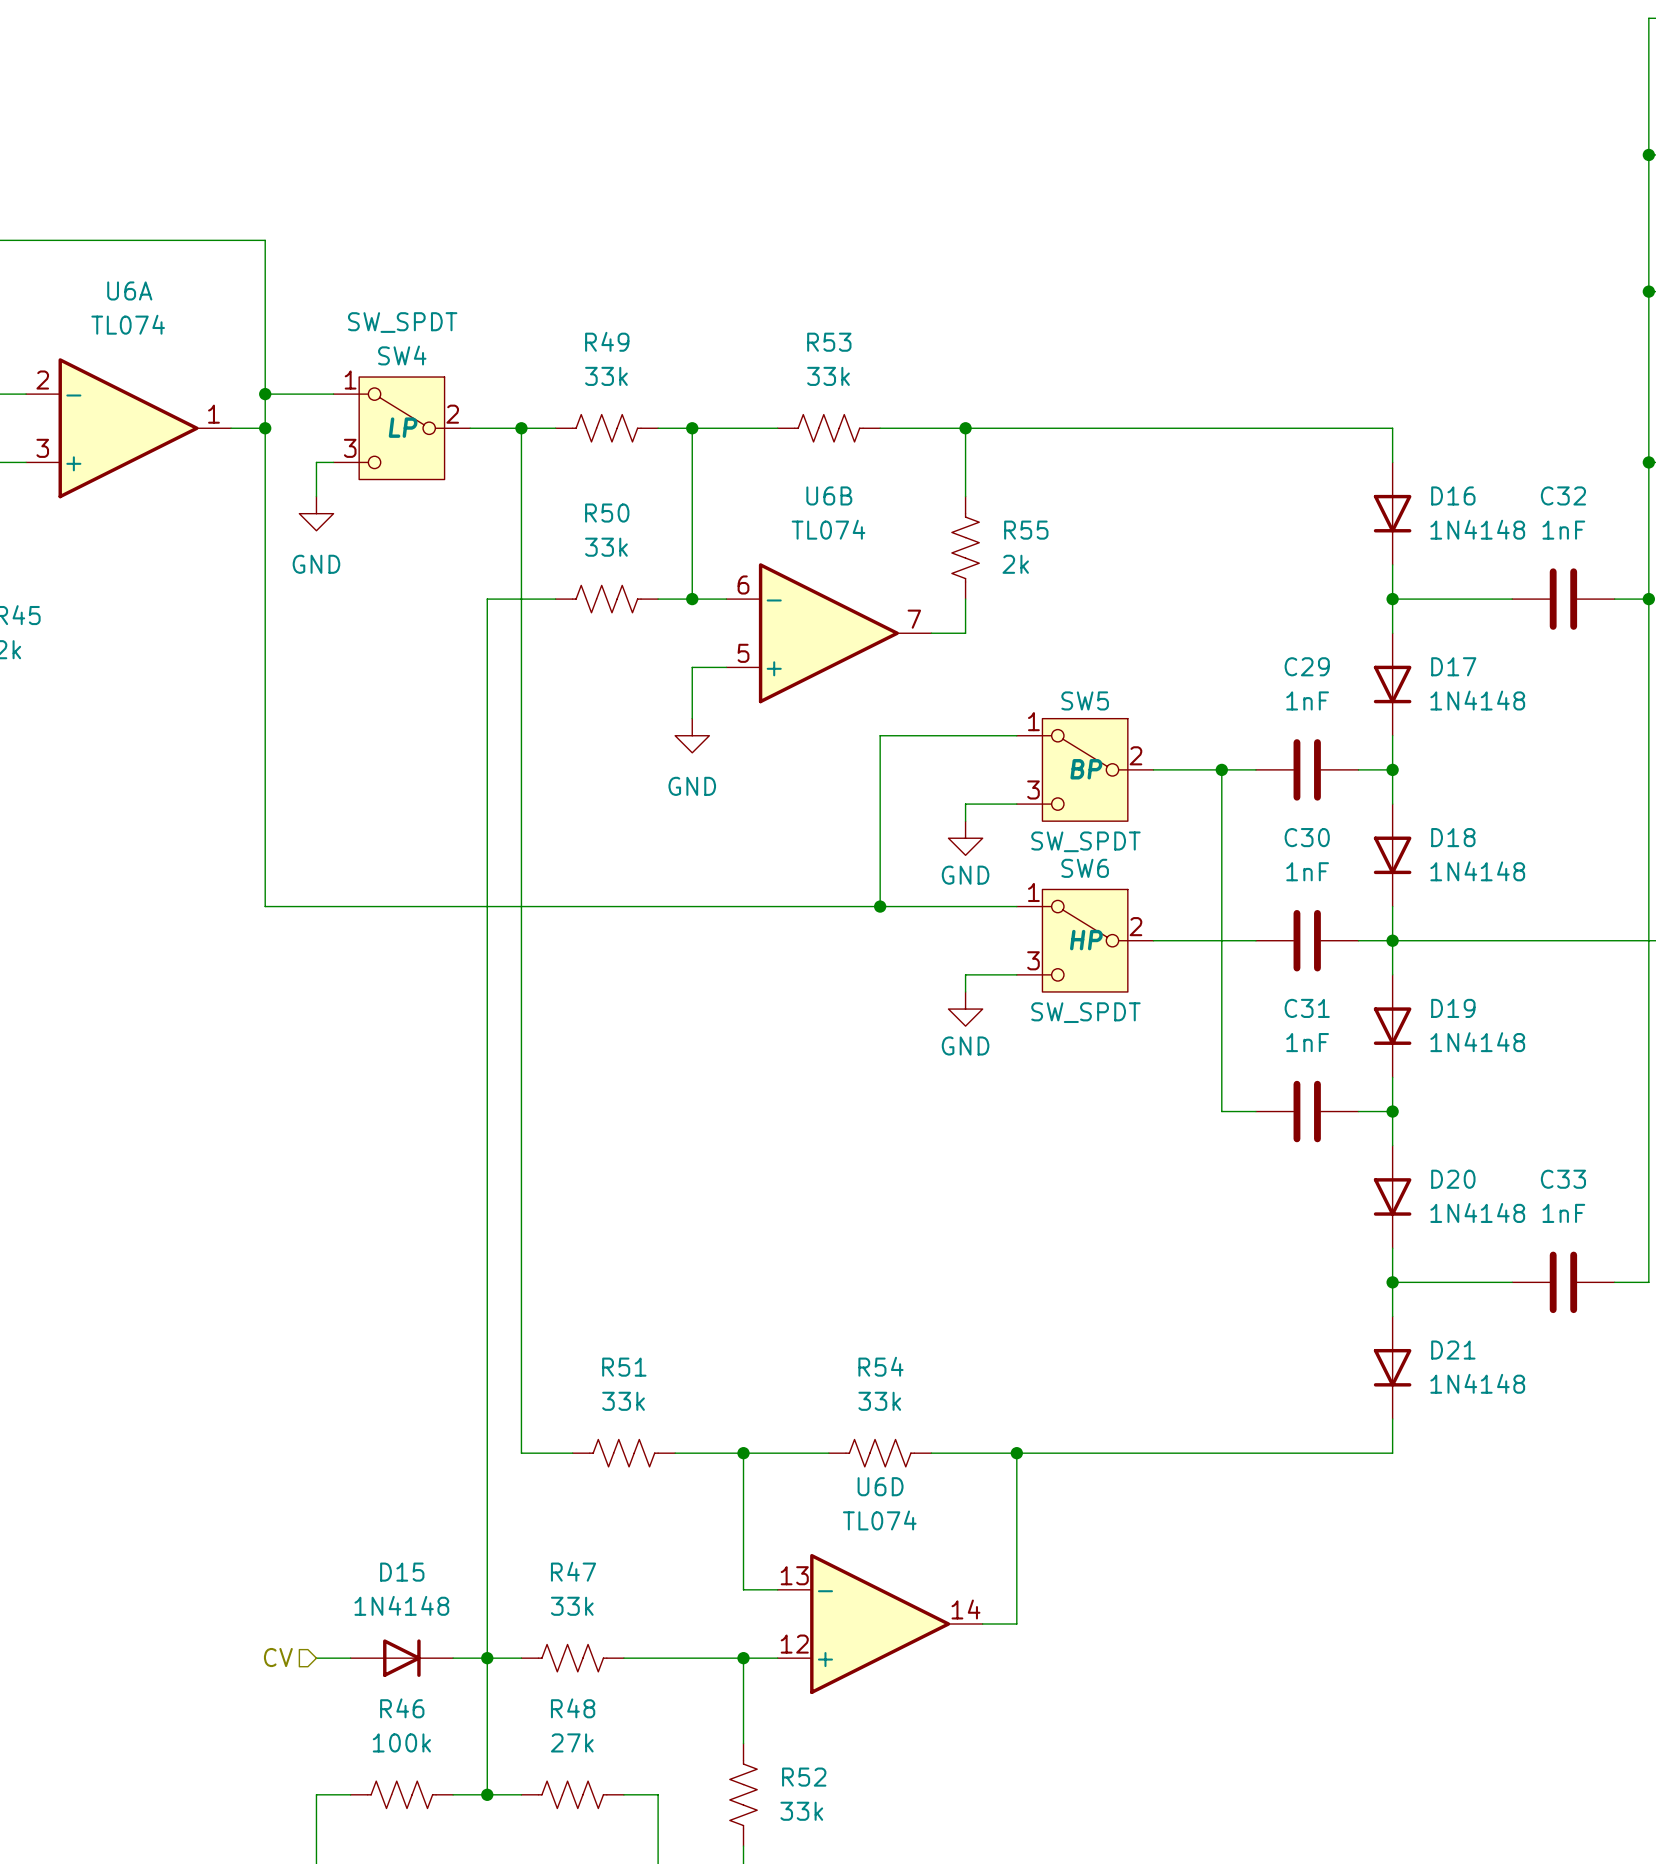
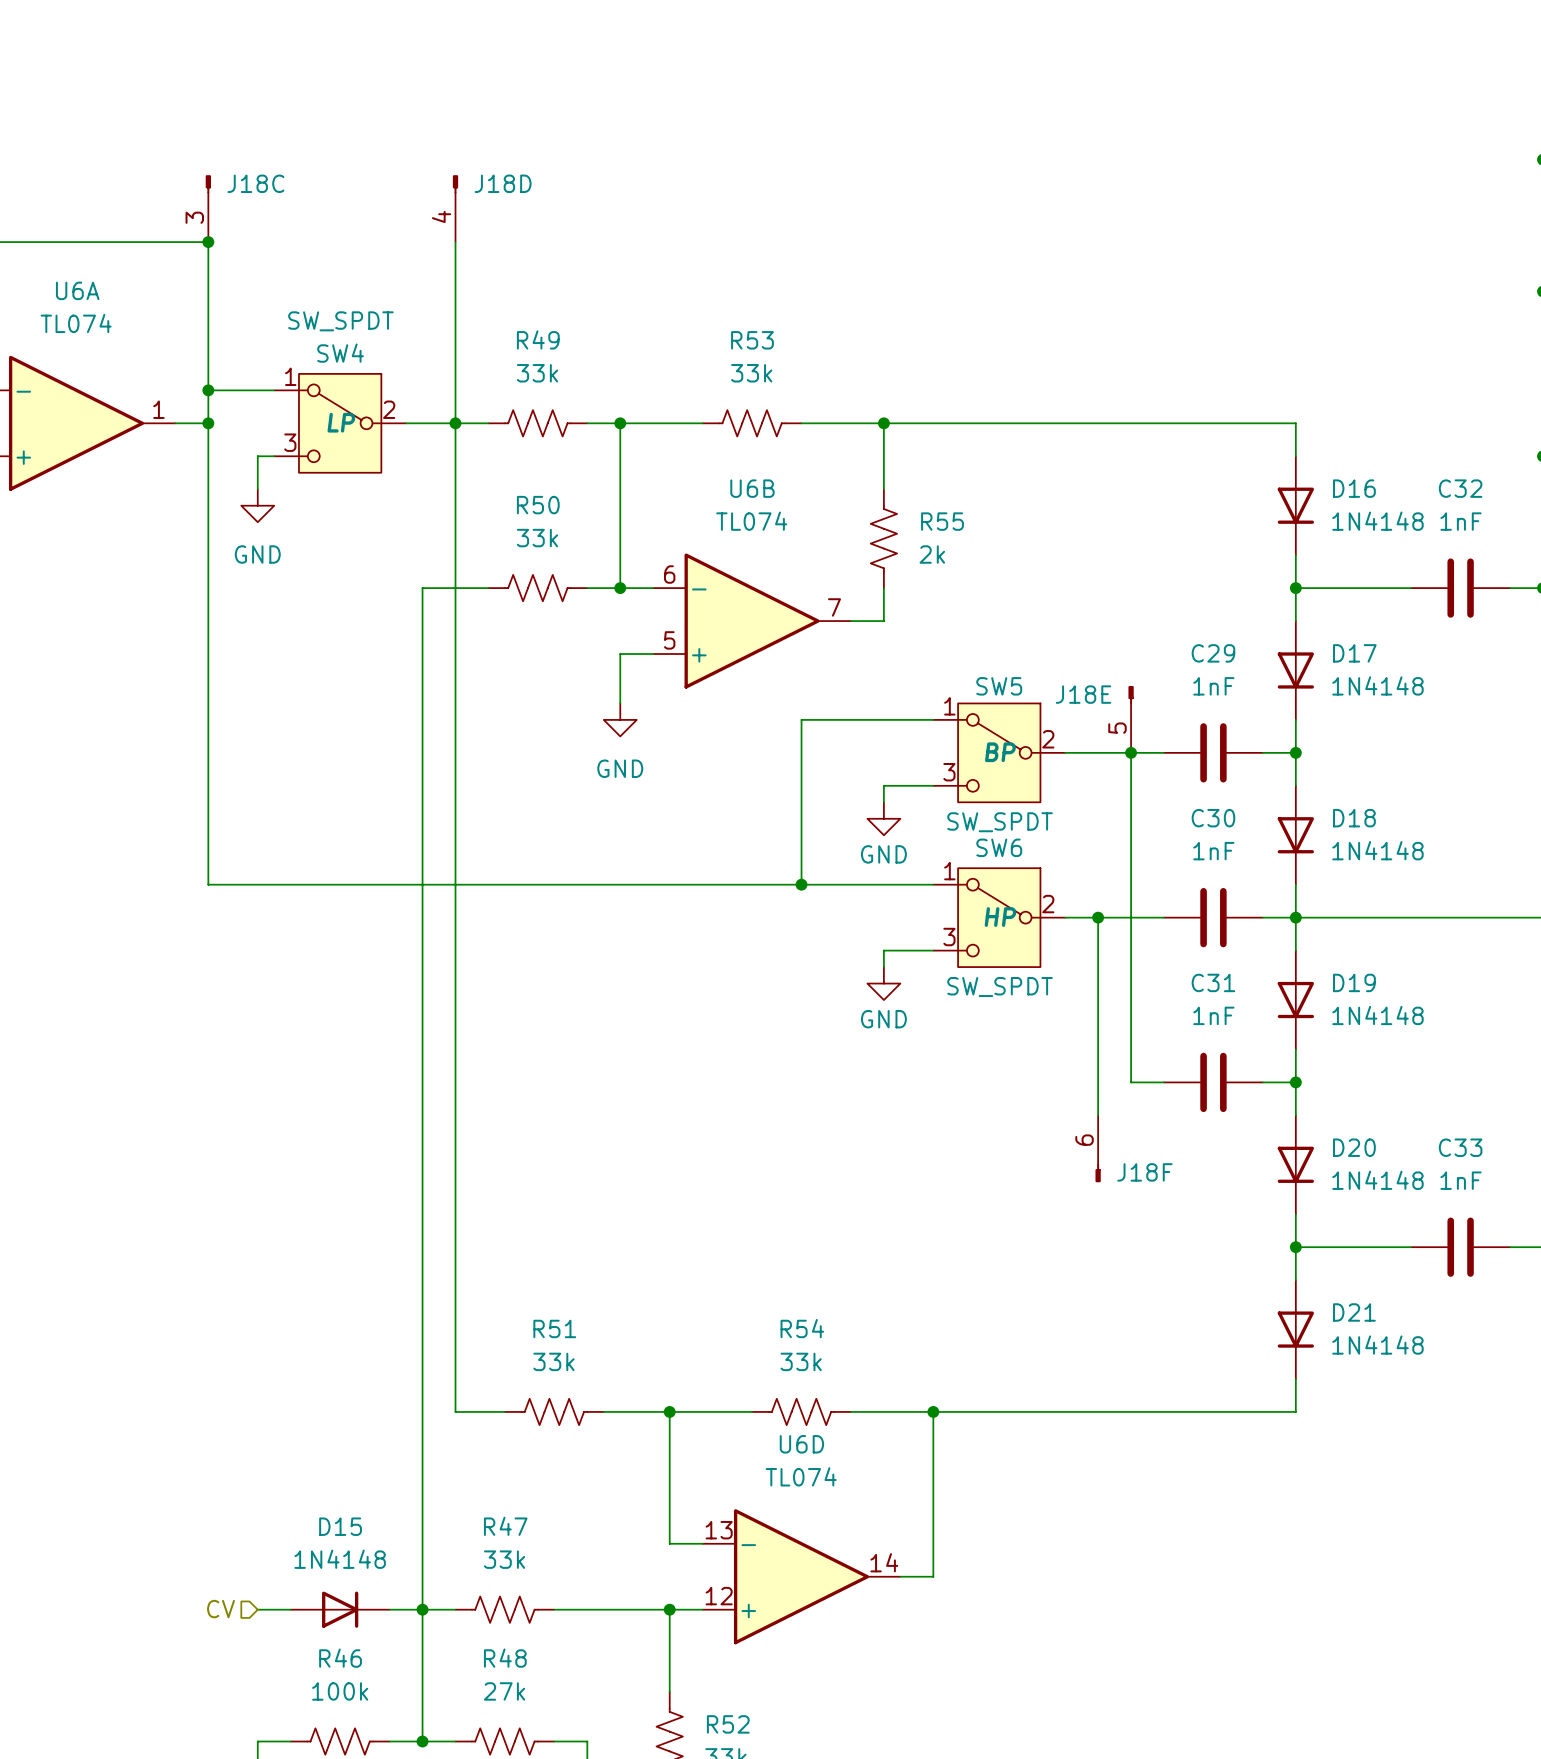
J18C: none -> (208, 208)
J18D: none -> (455, 208)
junction: none -> (208, 242)
wire: none -> (455, 242) (455, 423)
J18E: none -> (1131, 719)
wire: none -> (1098, 917) (1098, 1115)
junction: none -> (1098, 917)
J18F: none -> (1098, 1148)

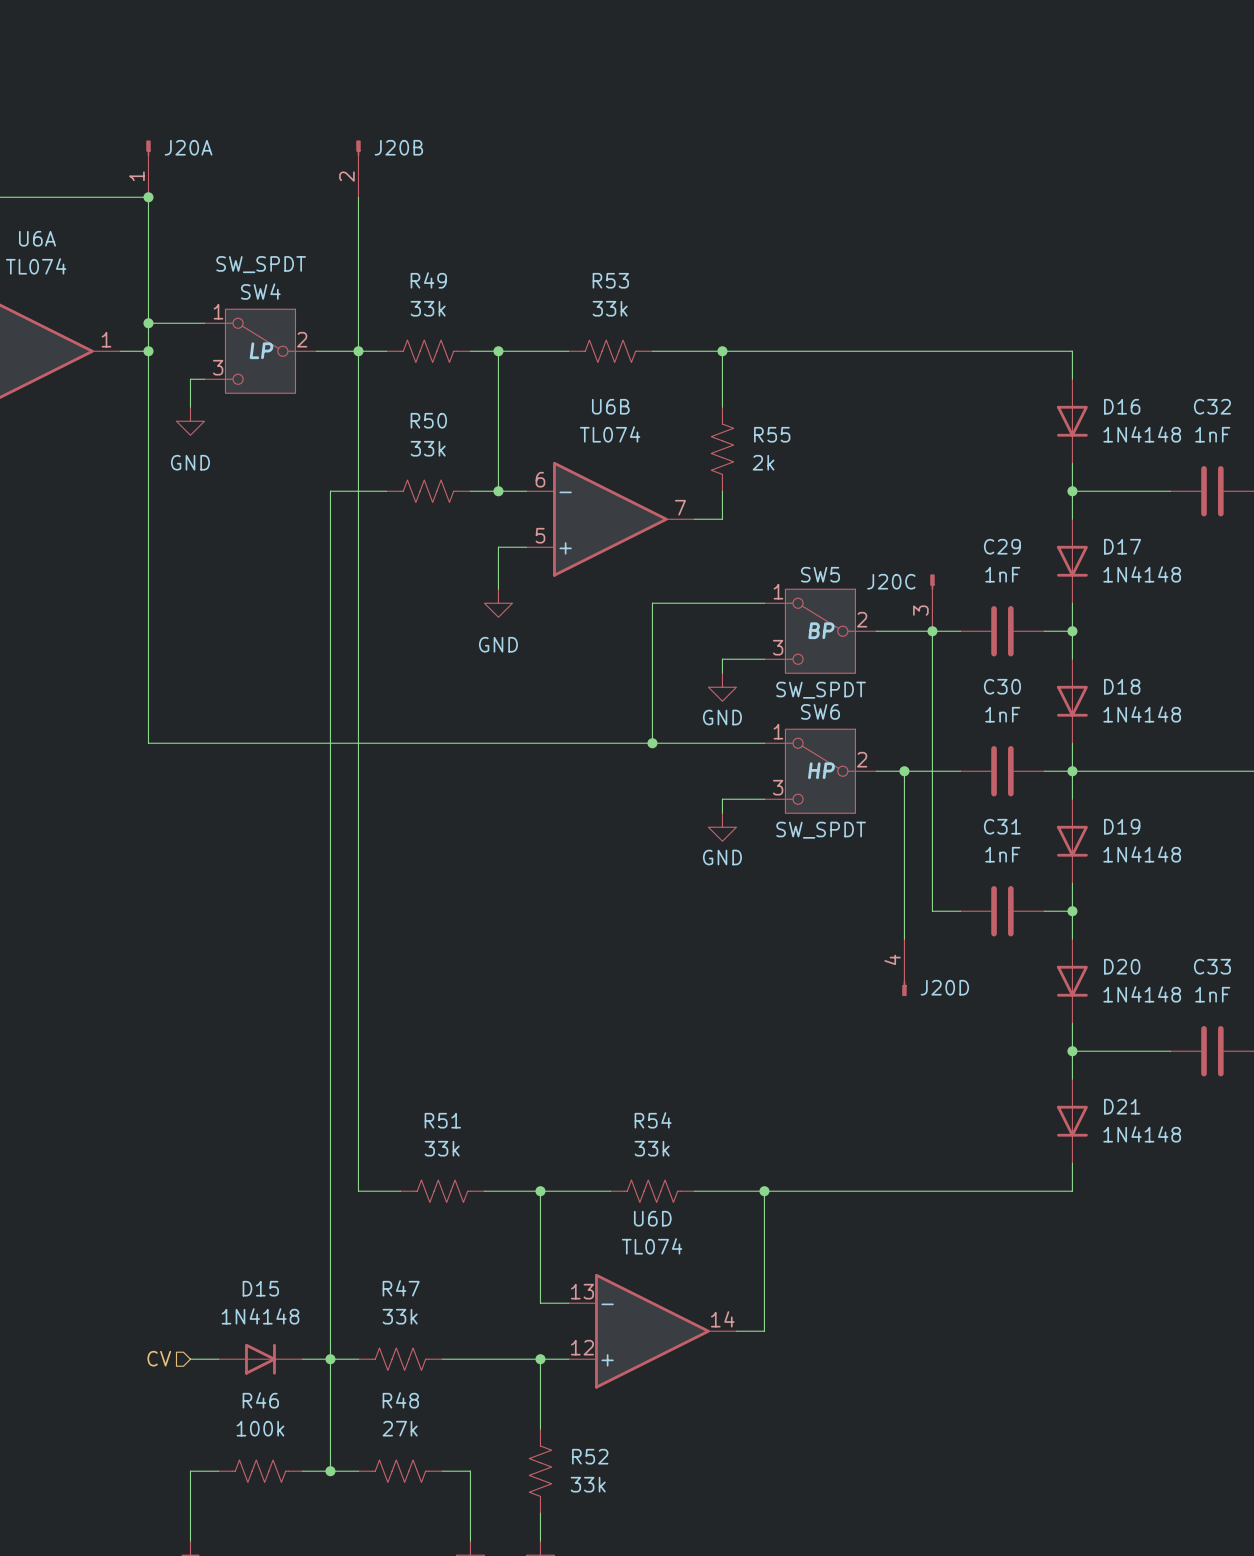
J18C name: J18C (255, 183) -> J20A (188, 147)
J18D name: J18D (503, 183) -> J20B (398, 147)
J18D pin number: 4 (441, 216) -> 2 (346, 176)
J18C pin number: 3 (194, 217) -> 1 (136, 176)
J18E name: J18E (1083, 694) -> J20C (891, 581)
J18E pin number: 5 (1117, 728) -> 3 (920, 610)
J18F pin number: 6 (1084, 1140) -> 4 (892, 959)
J18F name: J18F (1144, 1172) -> J20D (944, 987)

